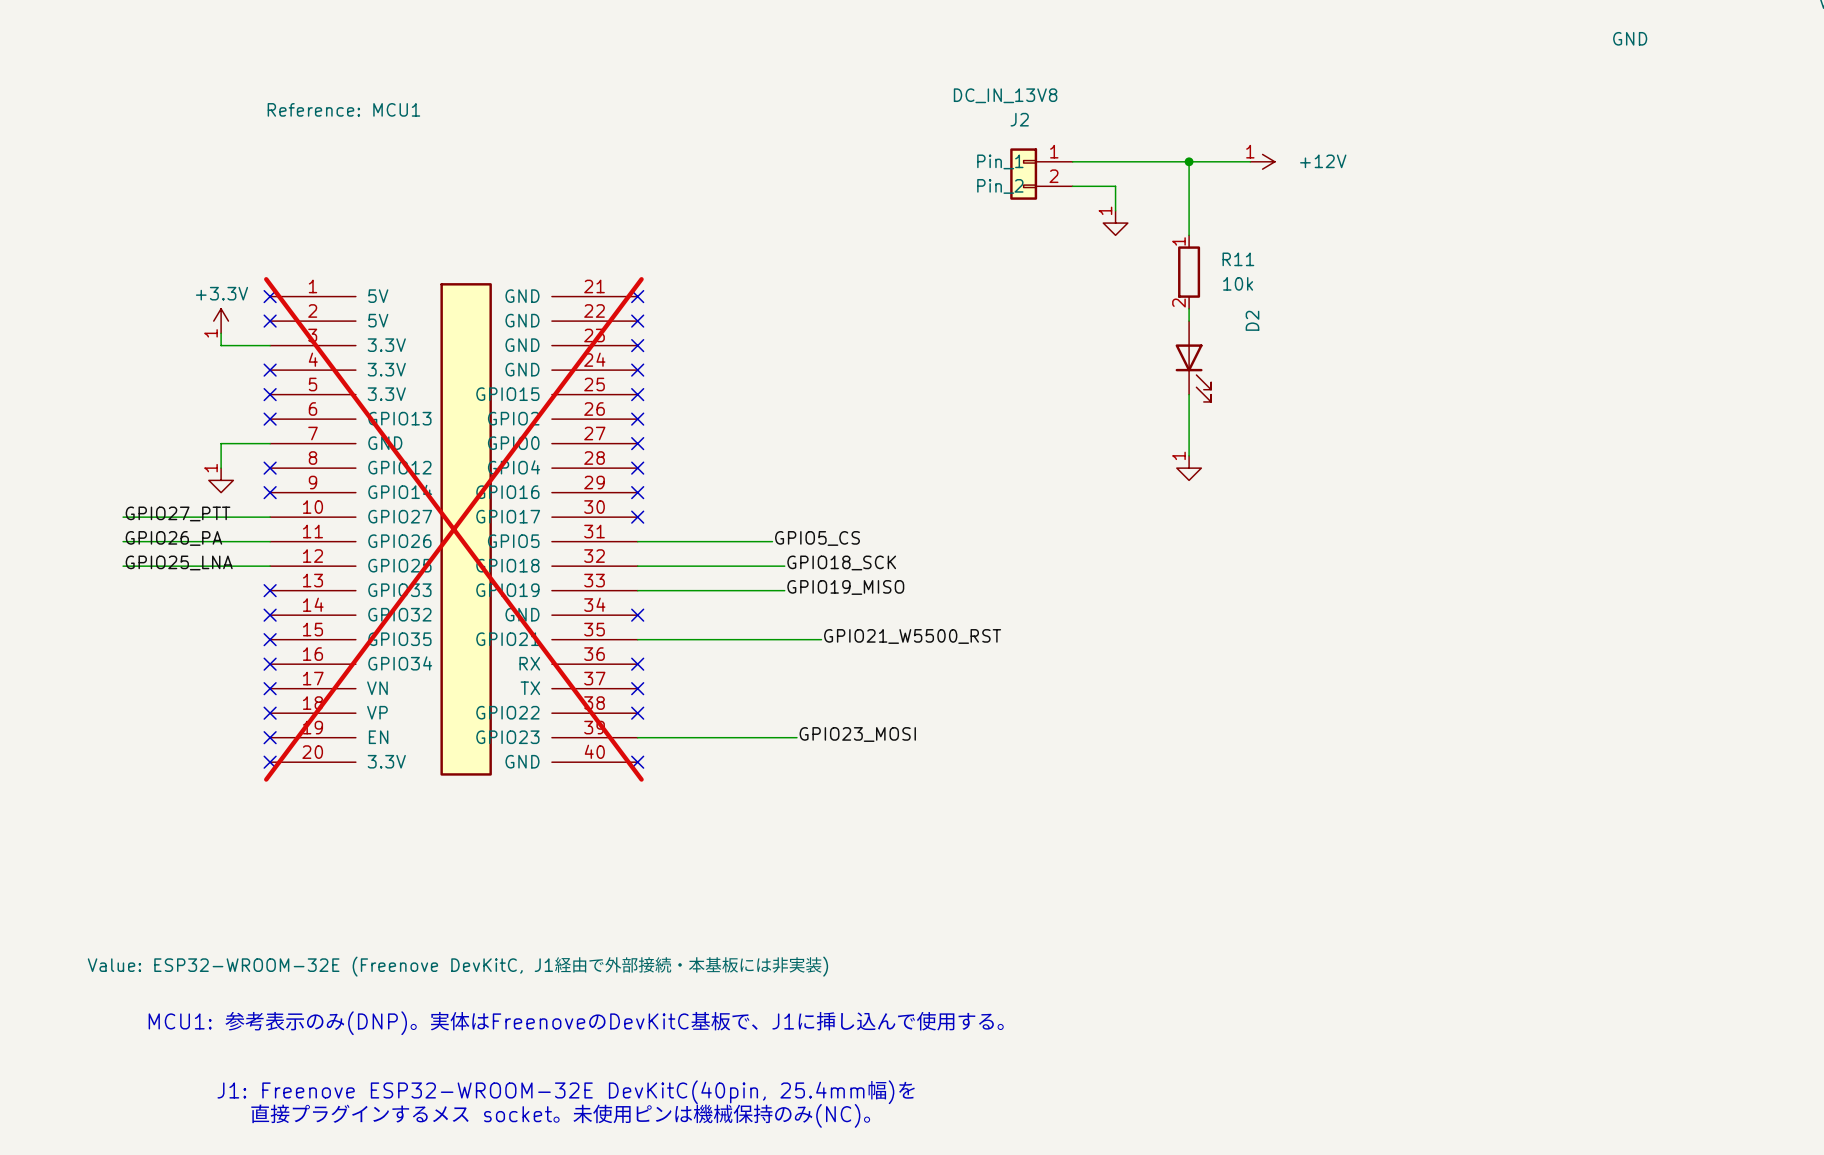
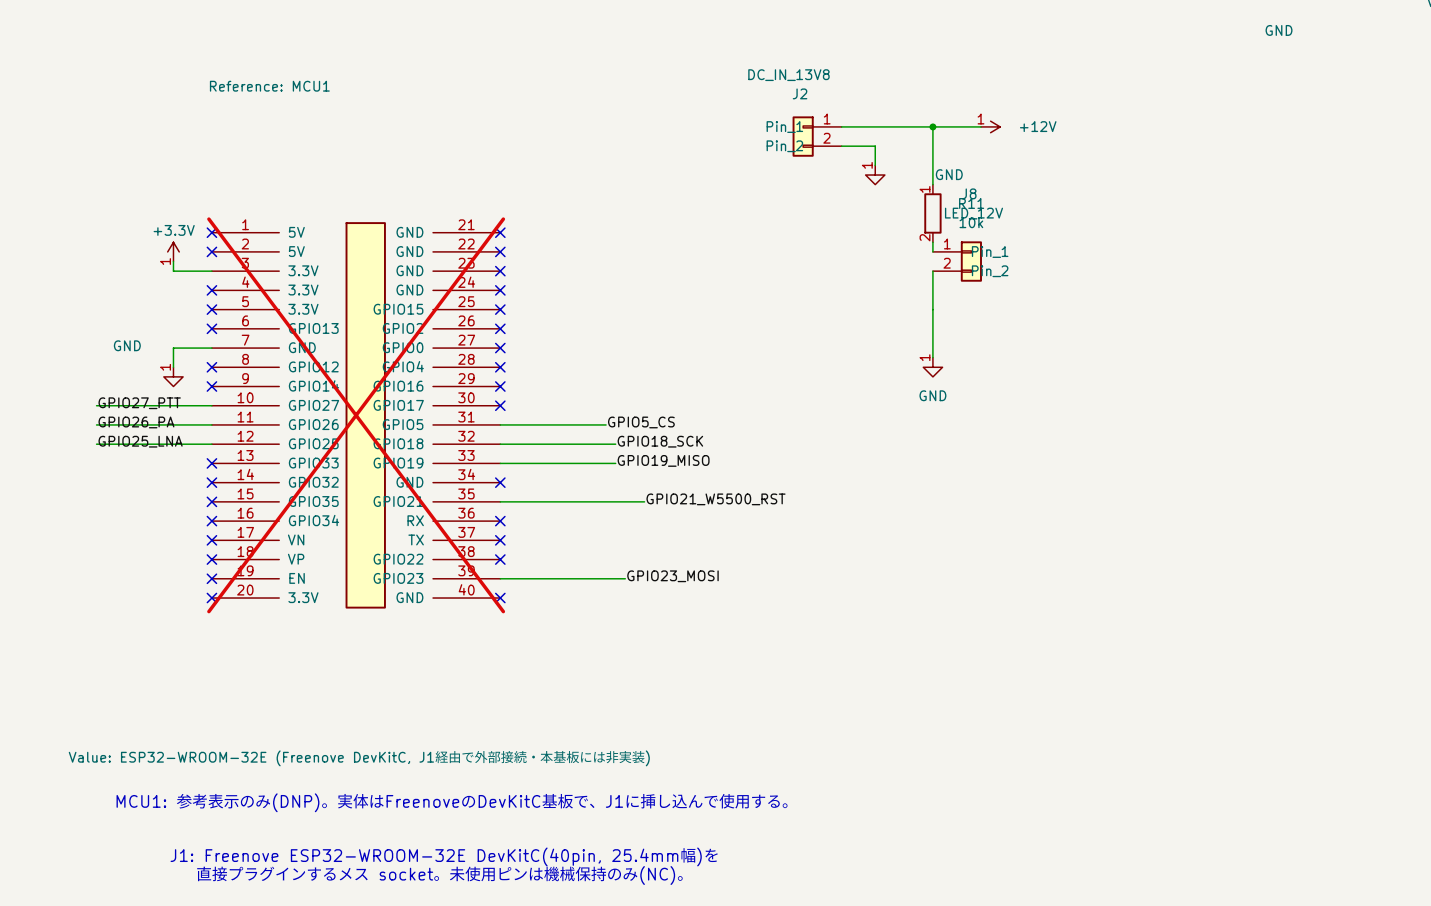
power symbol text: none -> GND (949, 174)
J8: none -> LED_12V (957, 261)
D2: (1193, 361) -> none
power symbol text: none -> GND (127, 345)
power symbol text: none -> GND (932, 395)

